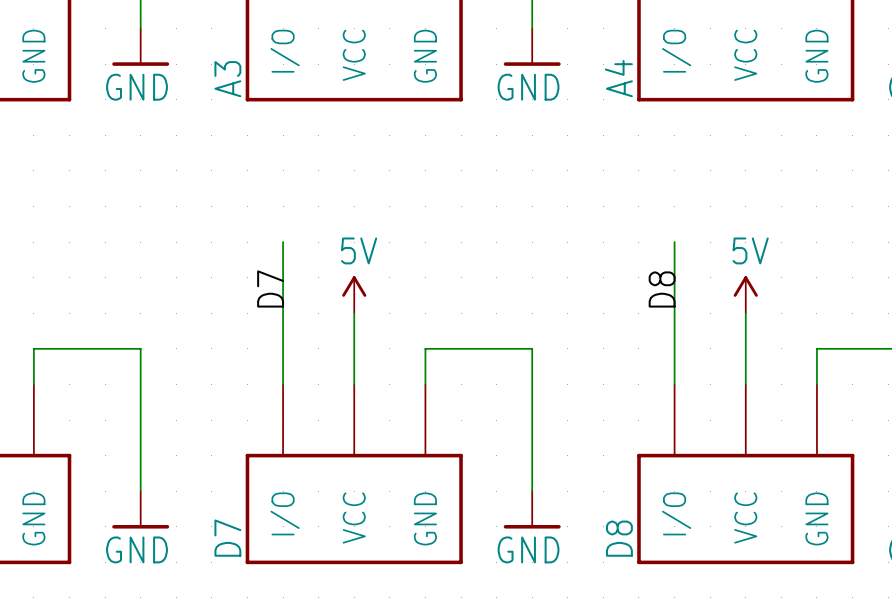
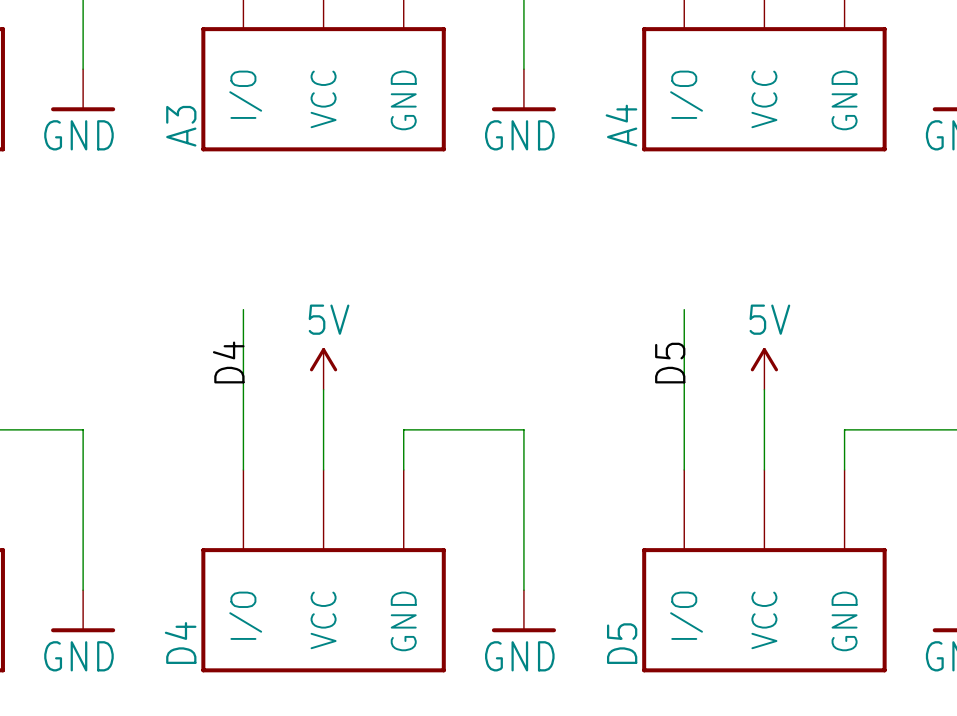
label: D7 (270, 288) -> D4 (228, 362)
label: D8 (662, 289) -> D5 (670, 363)
D7 name: D7 (227, 538) -> D4 (180, 643)
D8 name: D8 (619, 538) -> D5 (622, 643)

